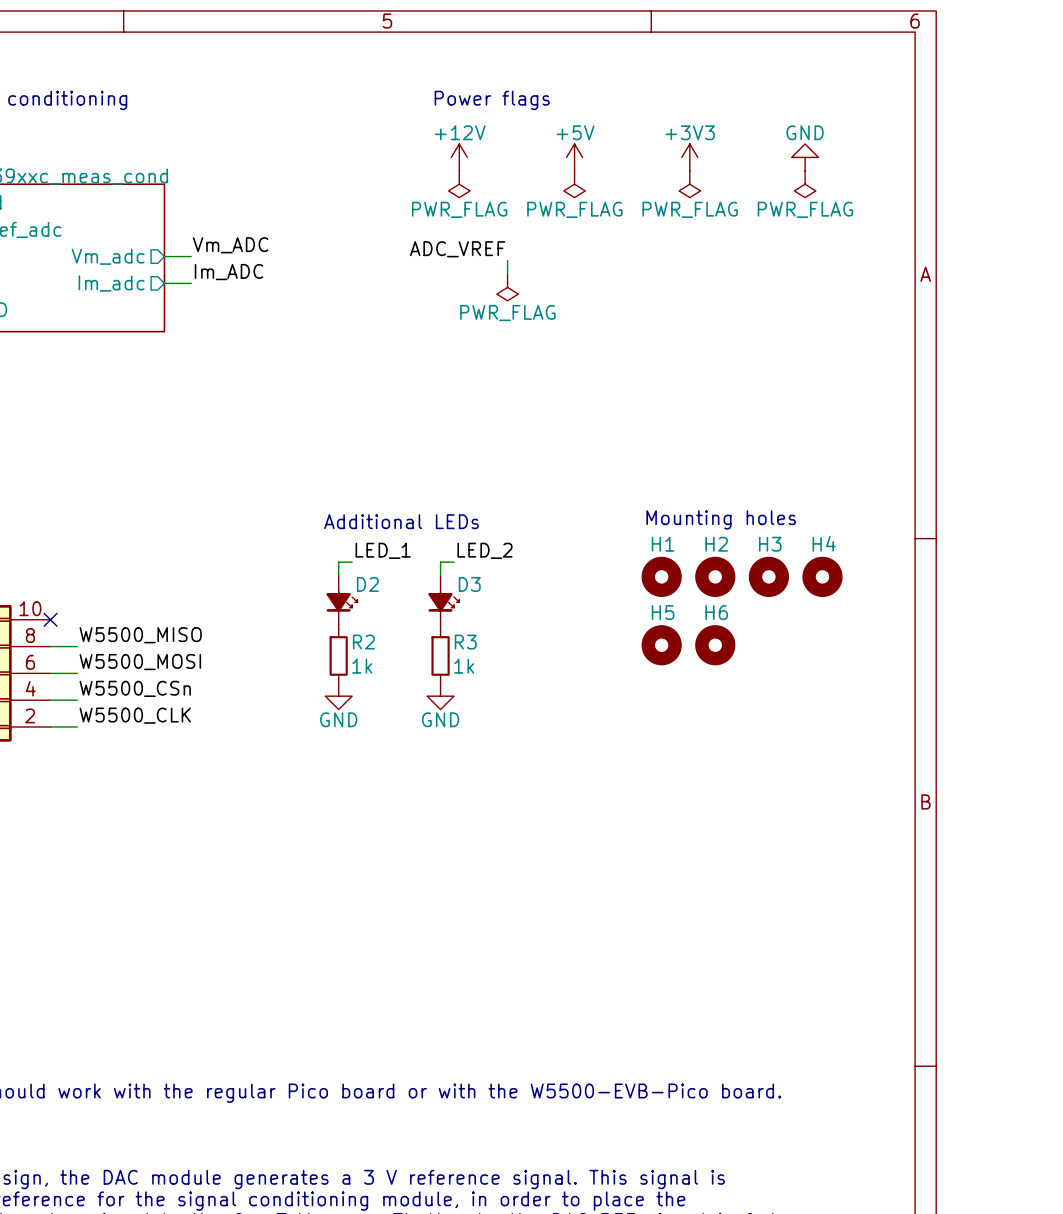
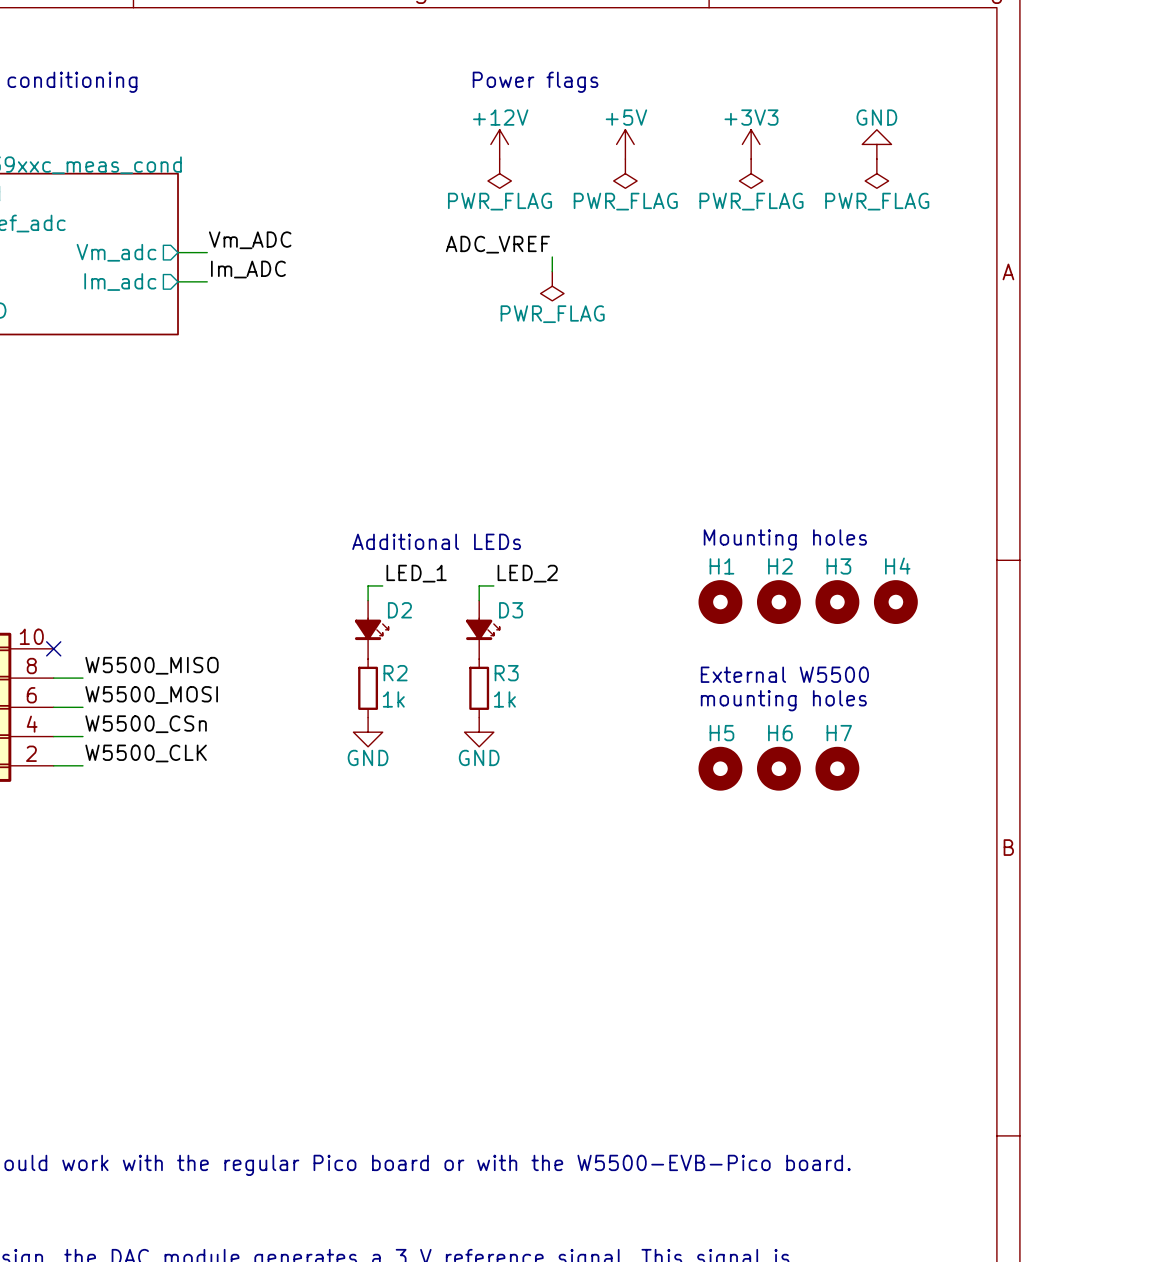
text: none -> External W5500 (784, 674)
H5 position: (661, 645) -> (720, 768)
H6 position: (715, 645) -> (778, 768)
text: none -> mounting holes (783, 700)
H7: none -> (837, 768)

